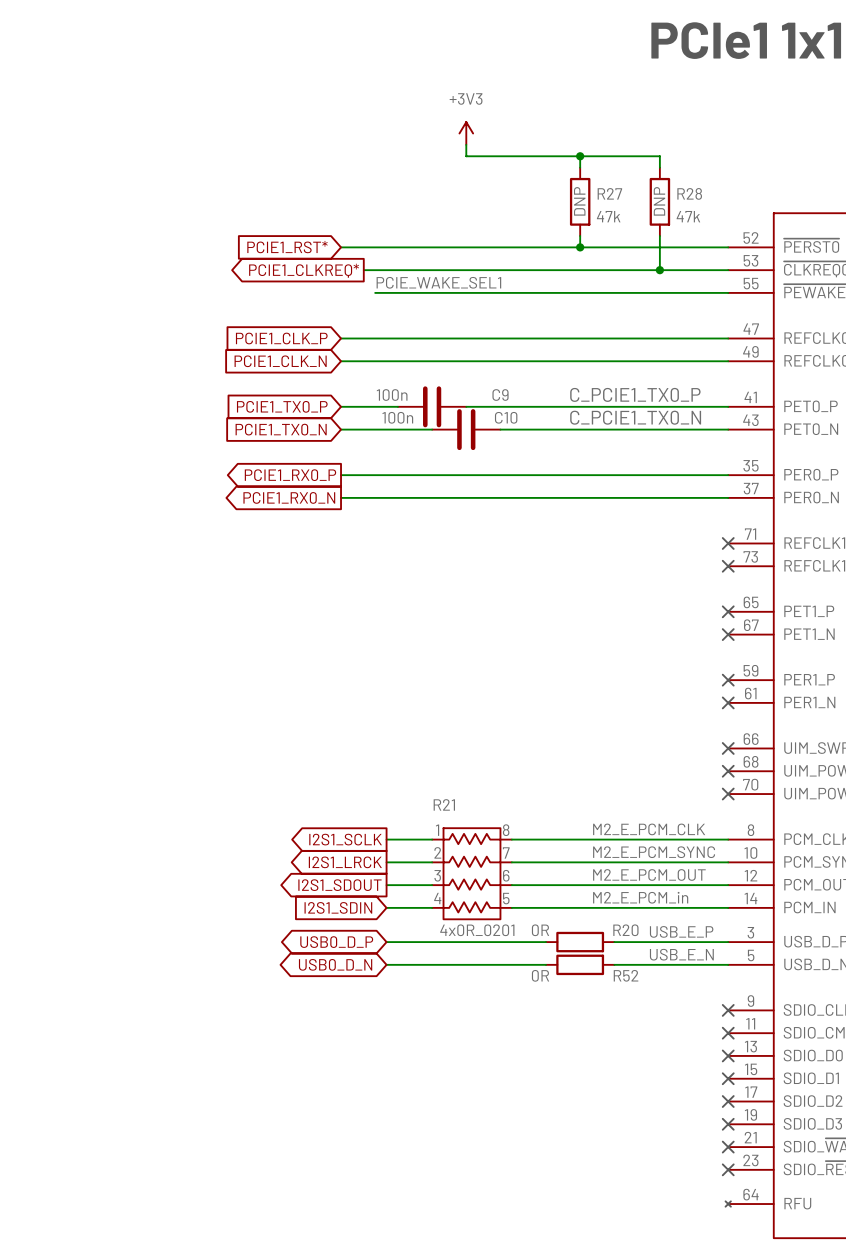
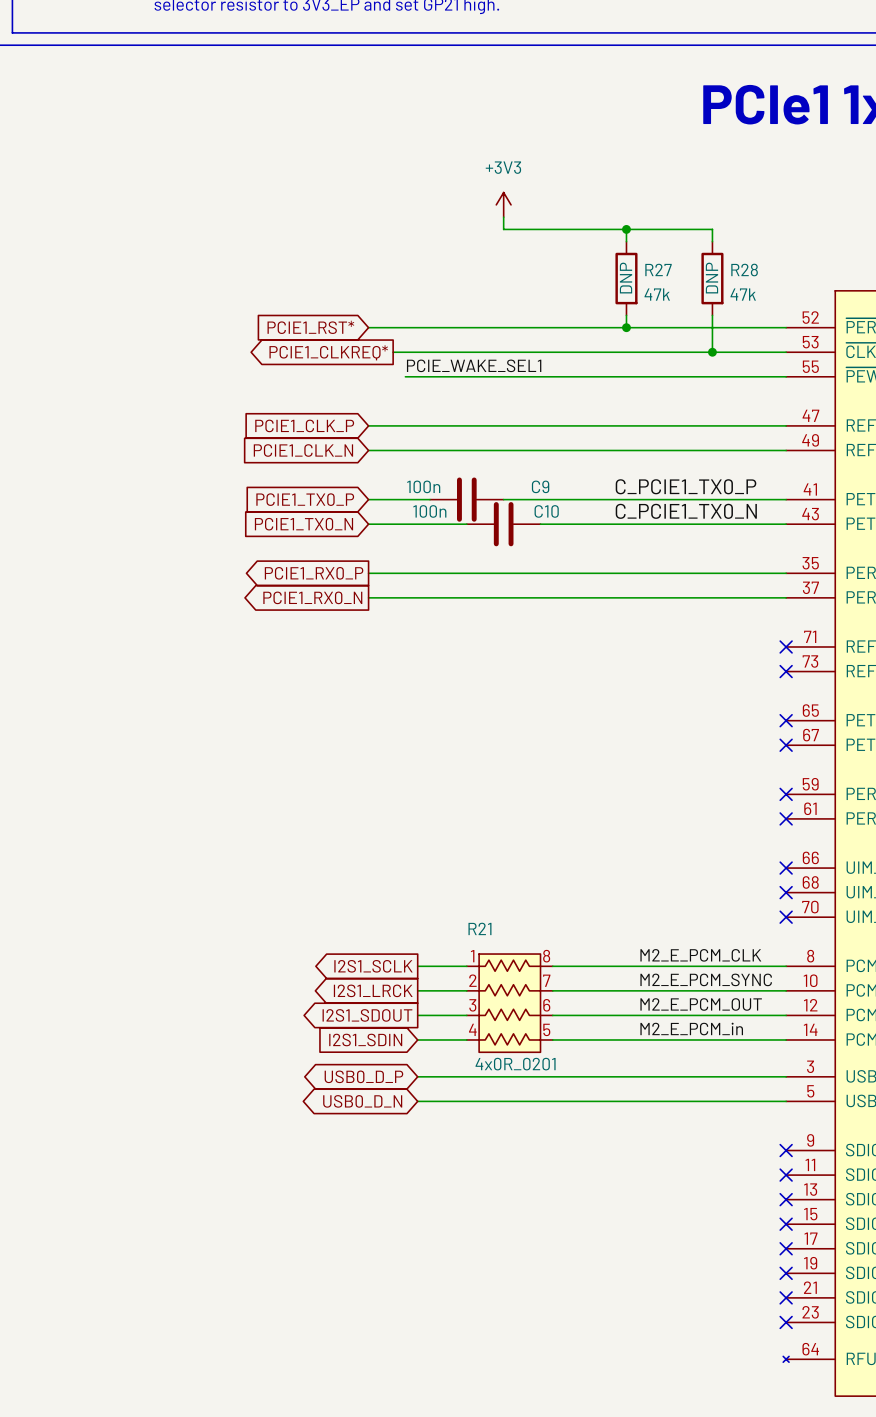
label: USB_E_P (681, 931) -> none
wire: none -> (589, 1076) (663, 1076)
R20: (580, 942) -> none
label: USB_E_N (681, 954) -> none
wire: none -> (589, 1101) (663, 1101)
R52: (580, 964) -> none

